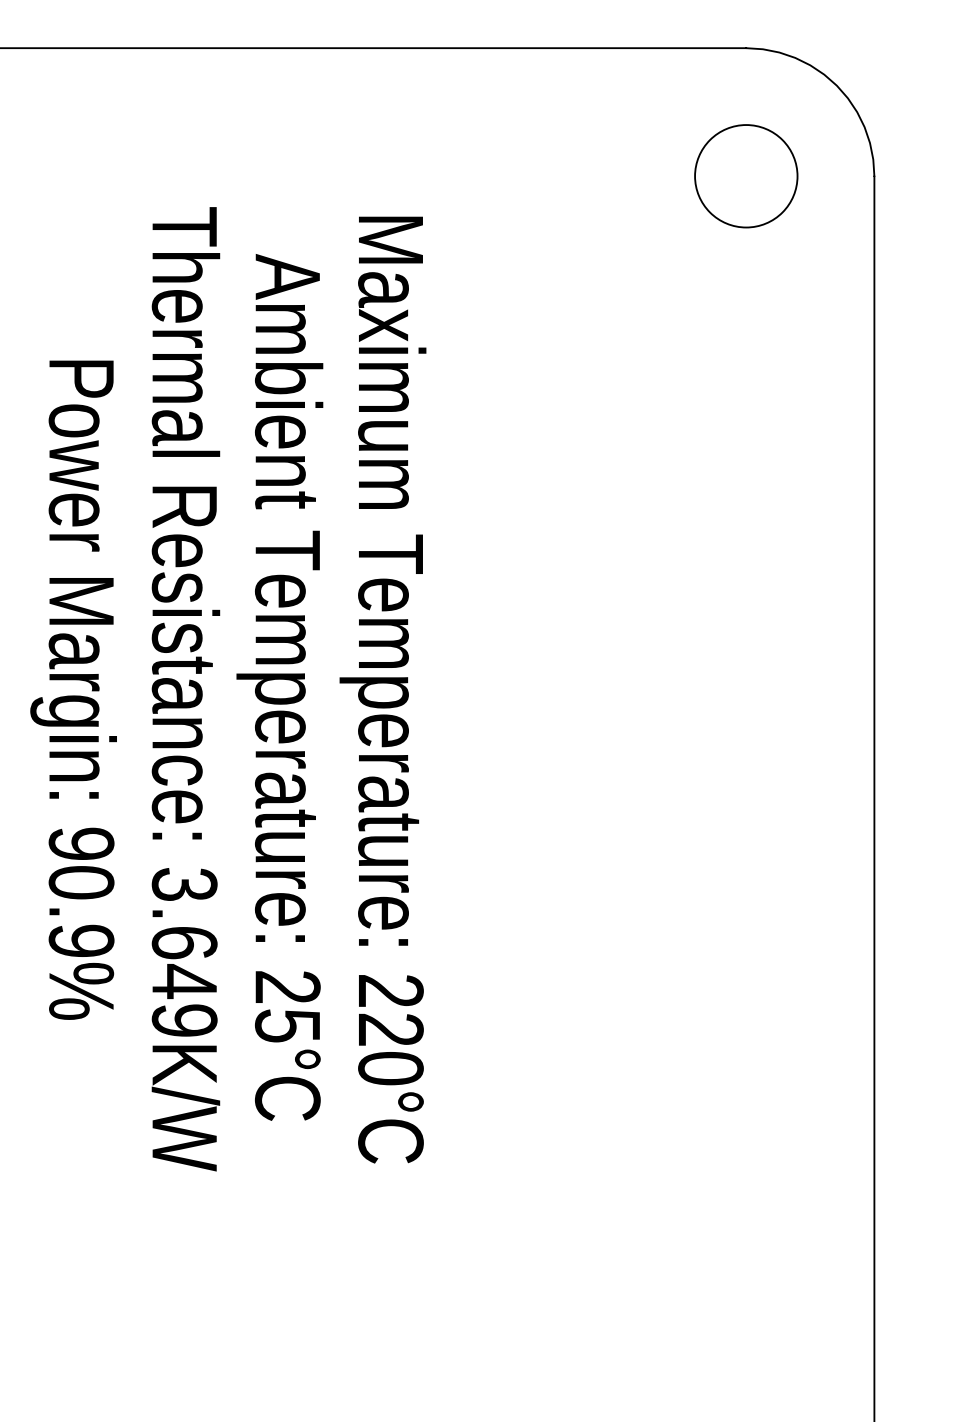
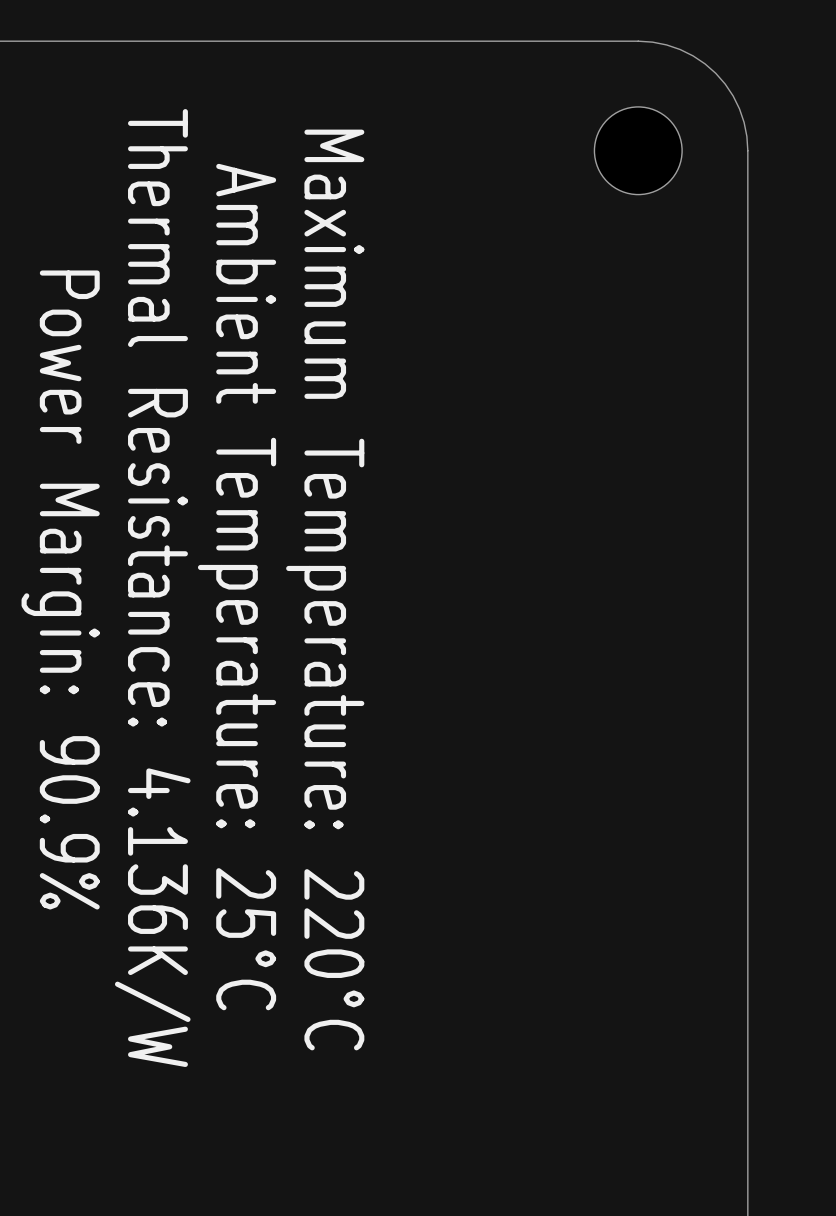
text: Thermal Resistance: 3.649K/W (185, 689) -> Thermal Resistance: 4.136K/W (152, 588)

